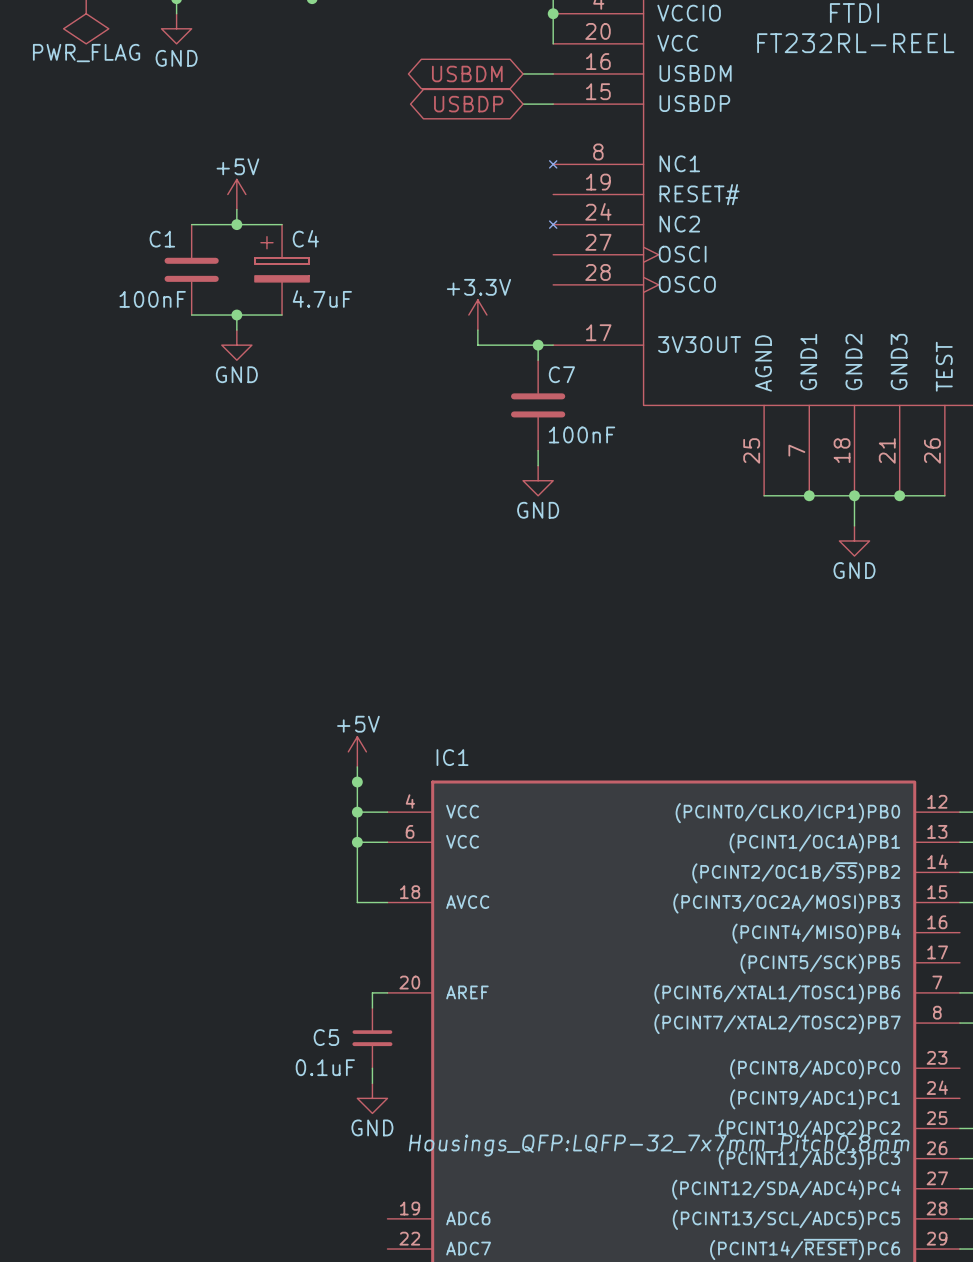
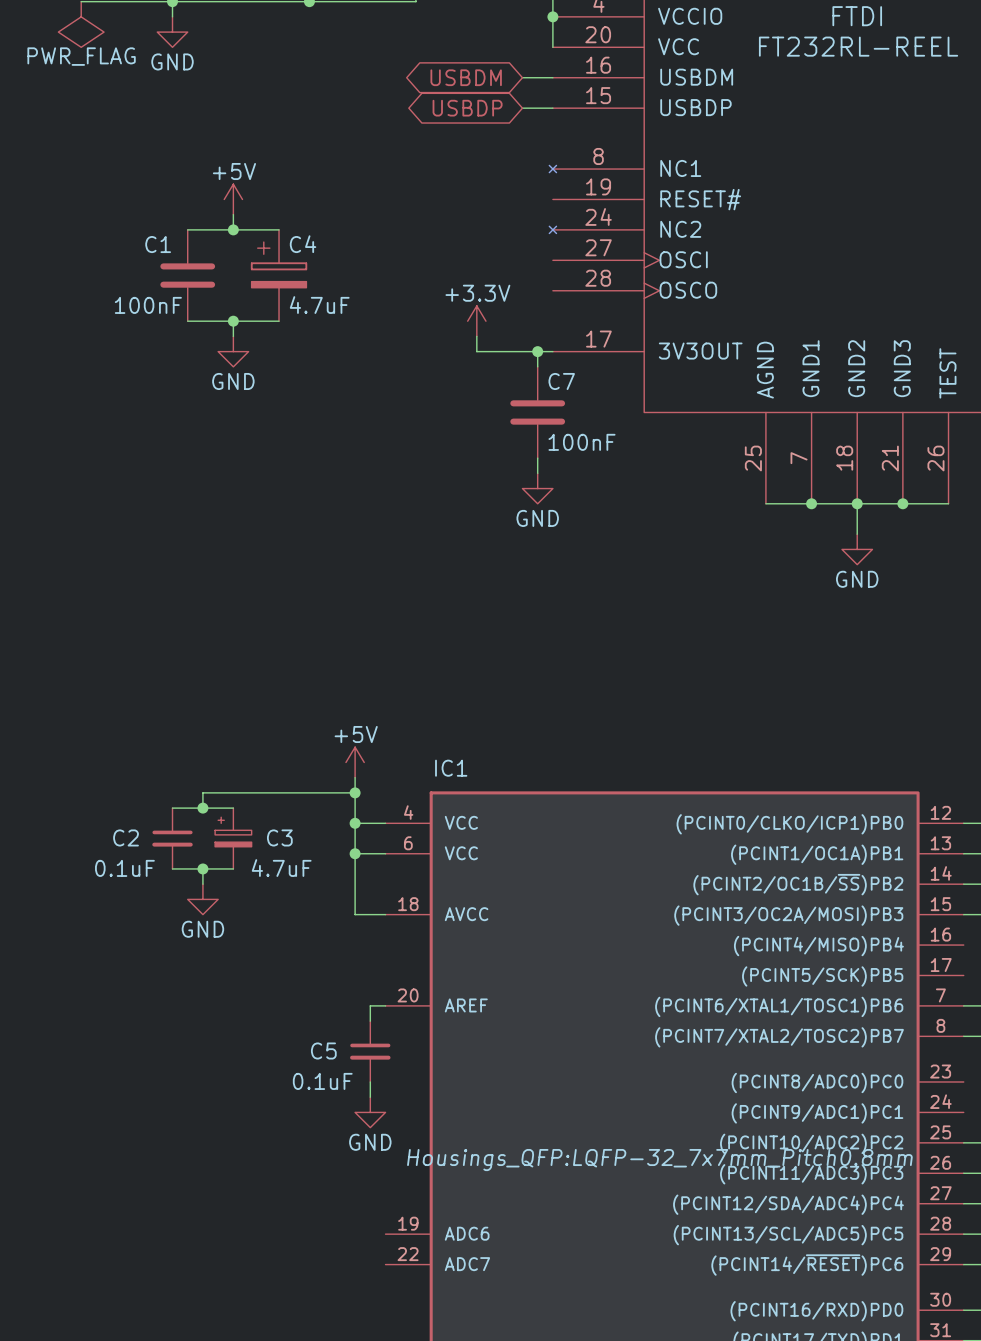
wire: none -> (355, 792) (202, 792) (202, 808)
wire: none -> (172, 808) (233, 808)
junction: none -> (202, 808)
C2: none -> 0.1uF (172, 838)
C3: none -> 4.7uF (233, 838)
wire: none -> (172, 868) (233, 868)
wire: none -> (202, 868) (202, 884)
junction: none -> (202, 868)
power symbol: none -> GND (202, 899)

